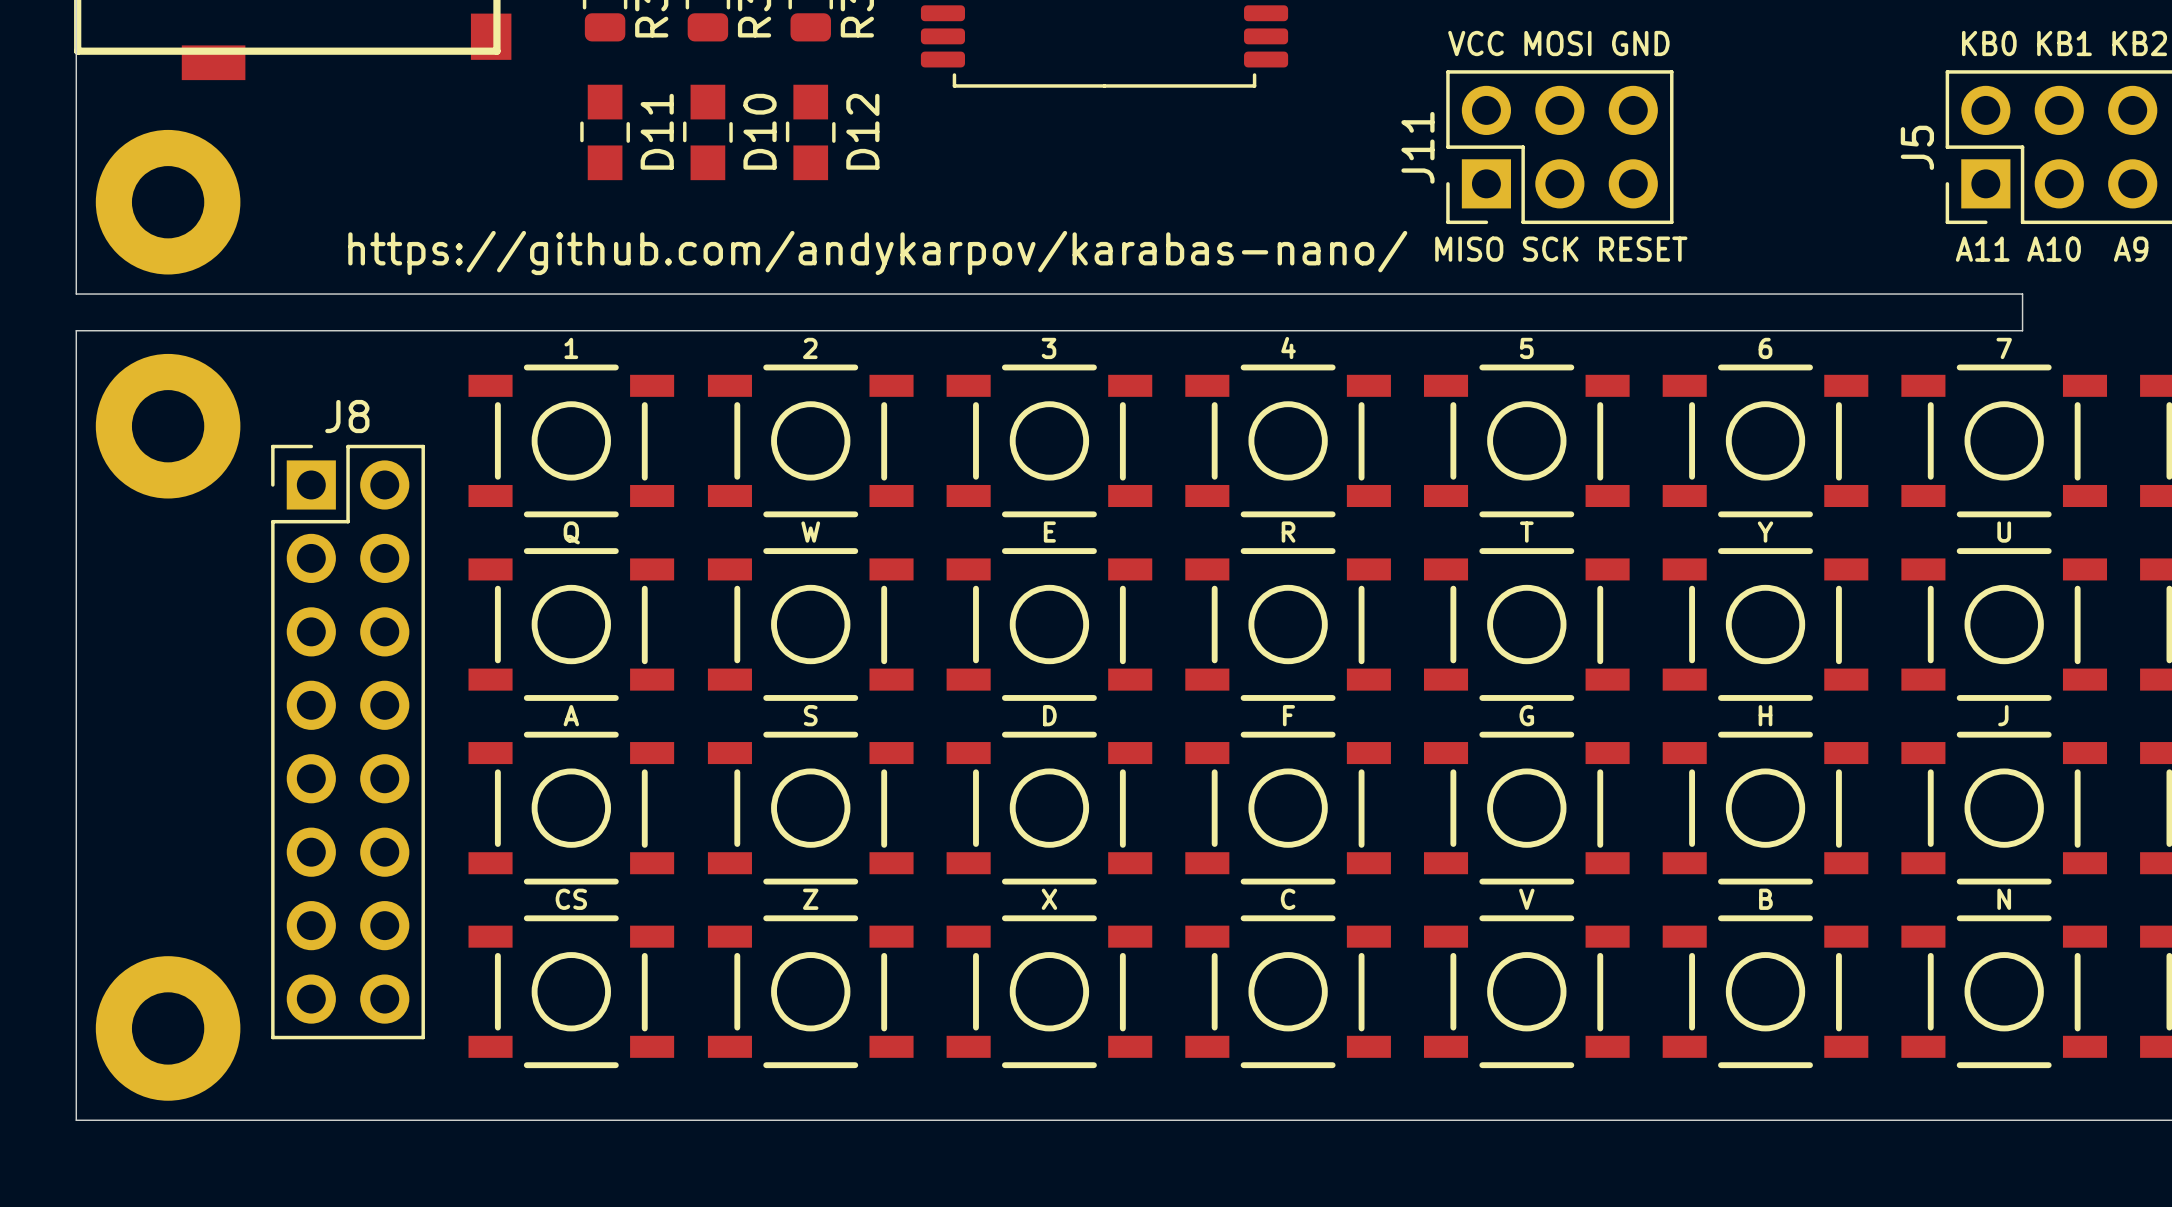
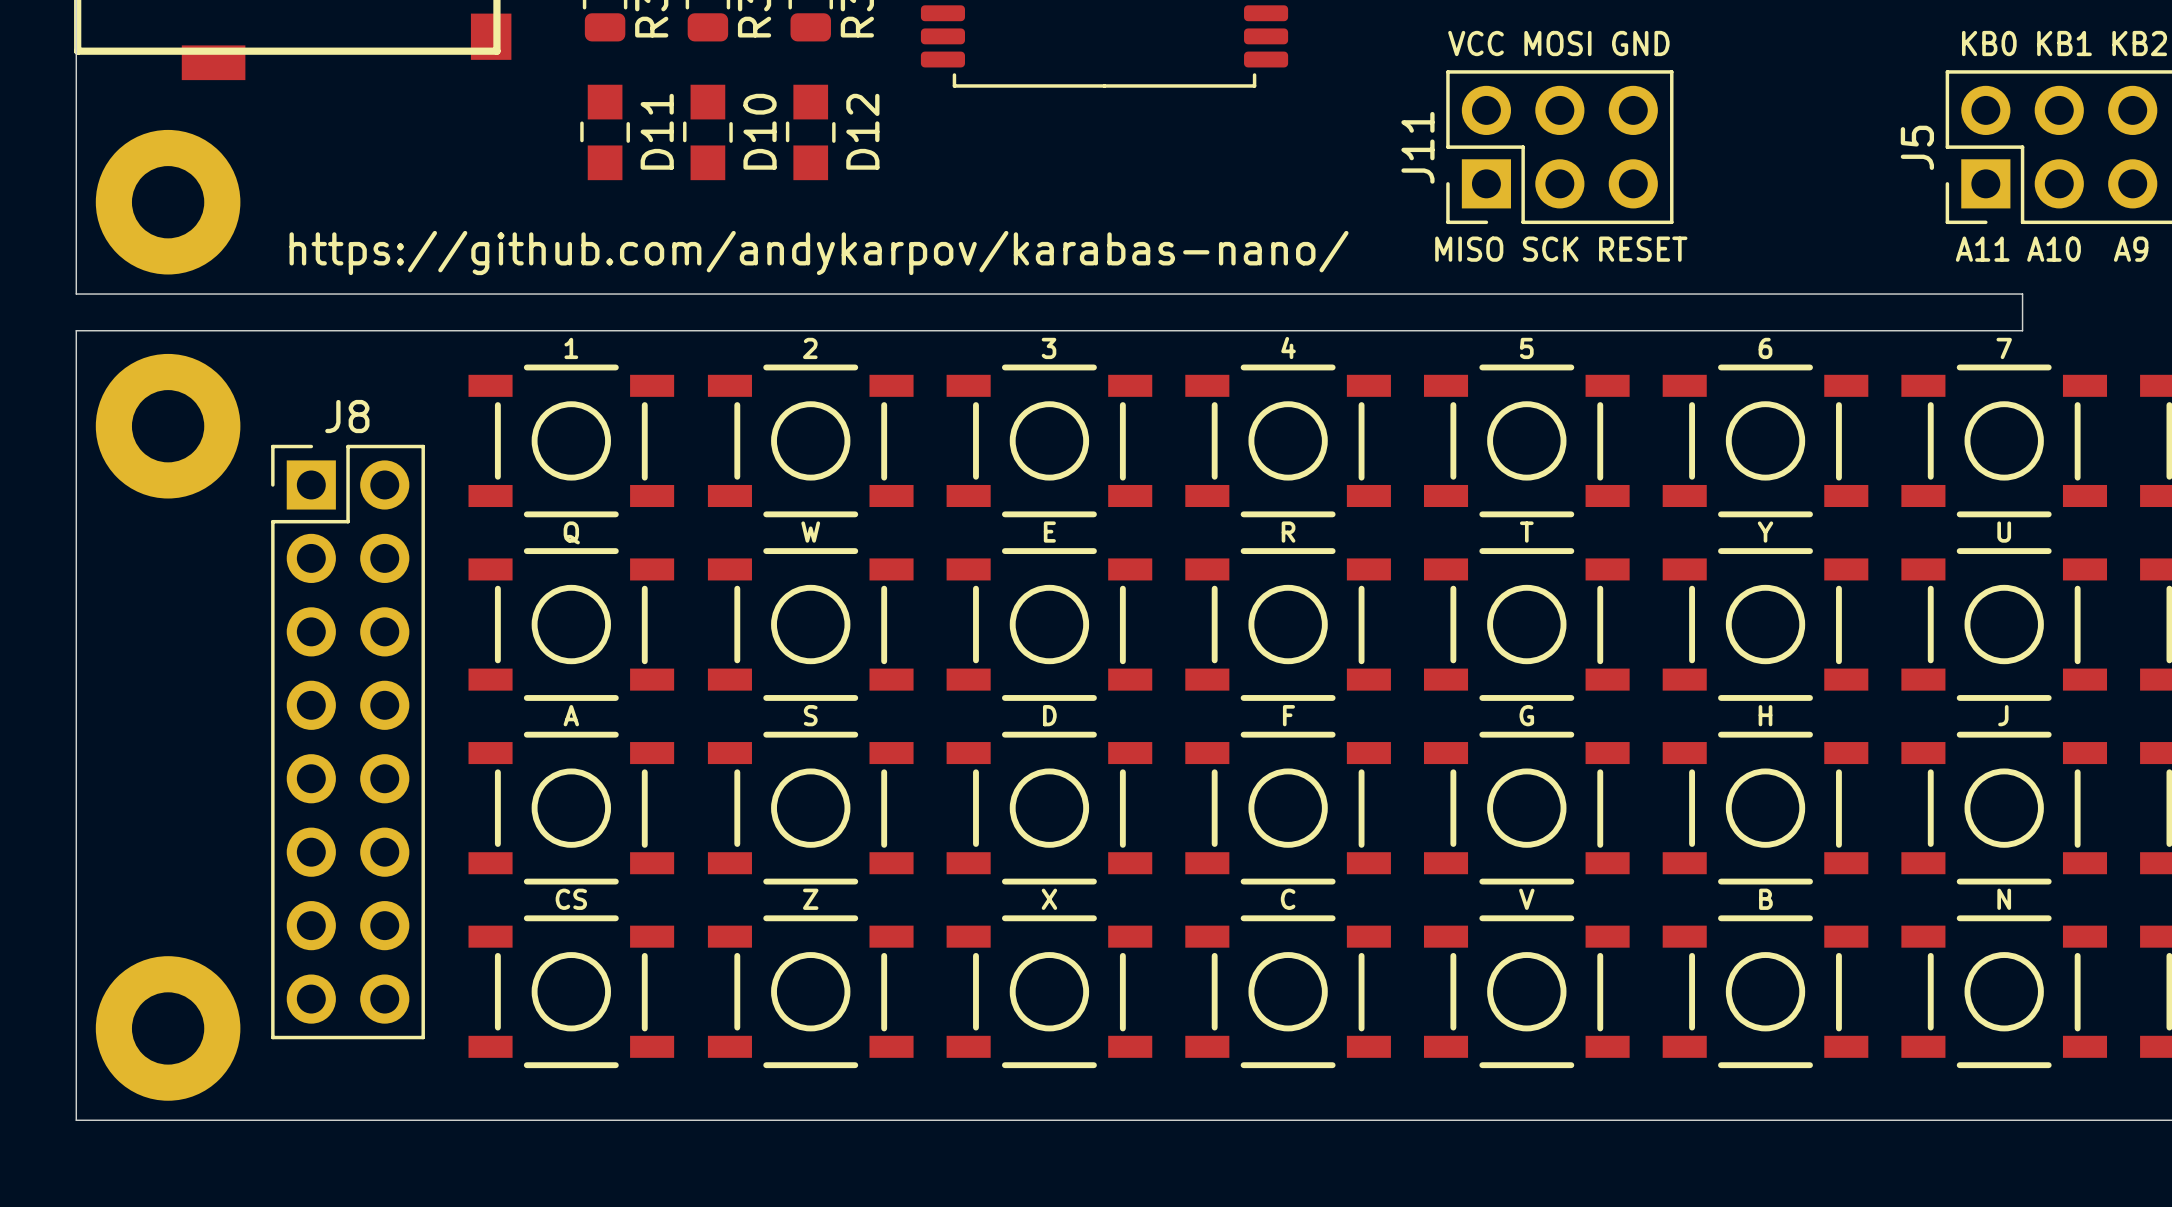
text position: https://github.com/andykarpov/karabas-nano/ (877, 253) -> https://github.com/andykarpov/karabas-nano/ (819, 253)

